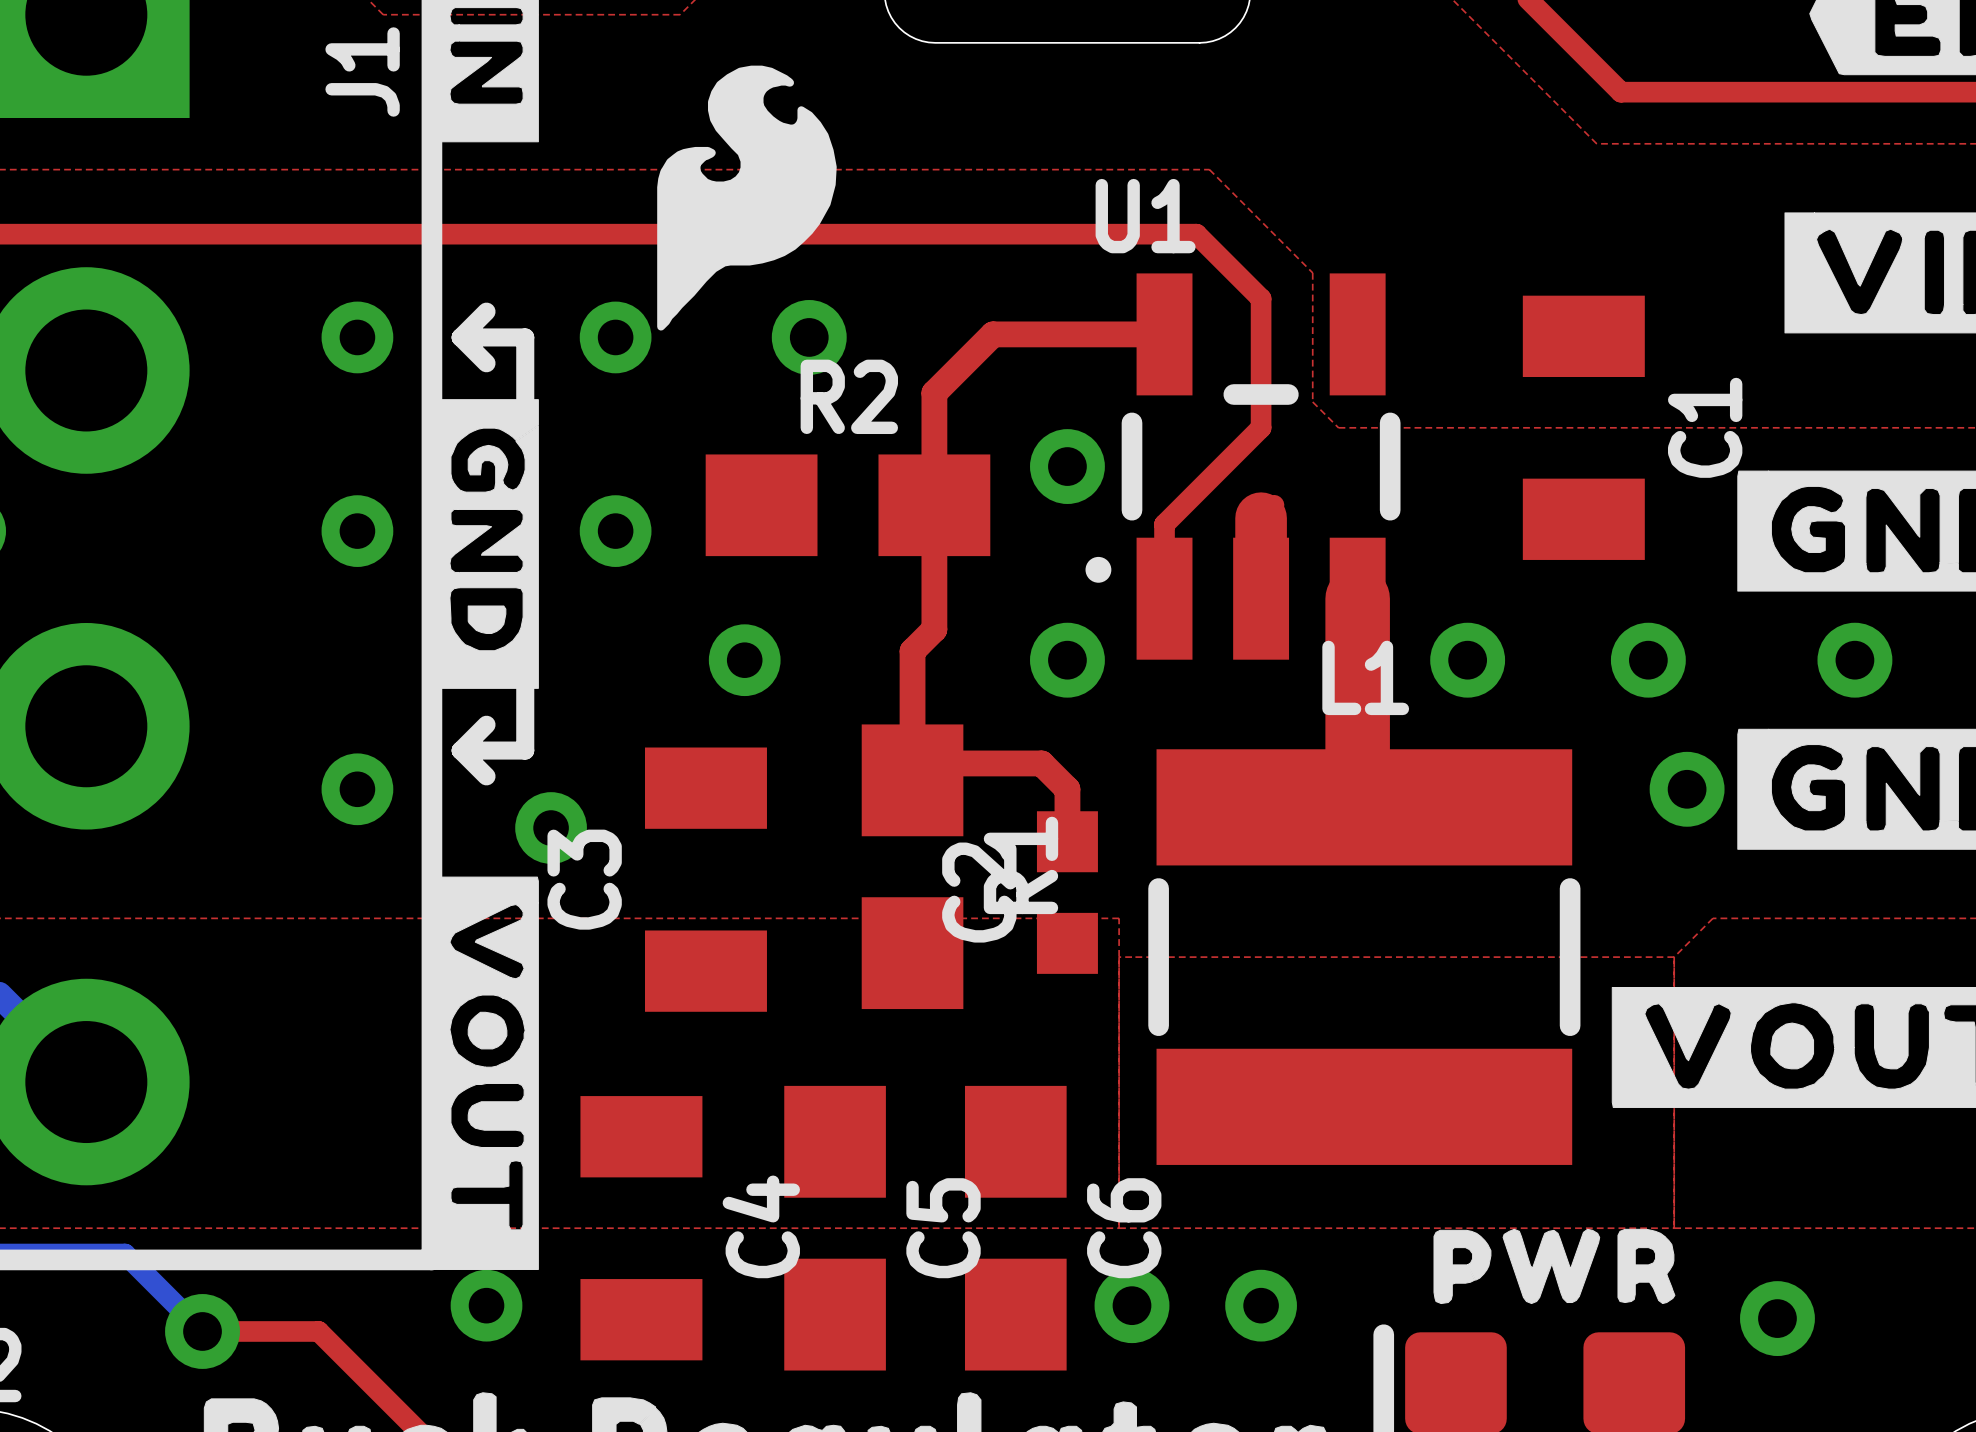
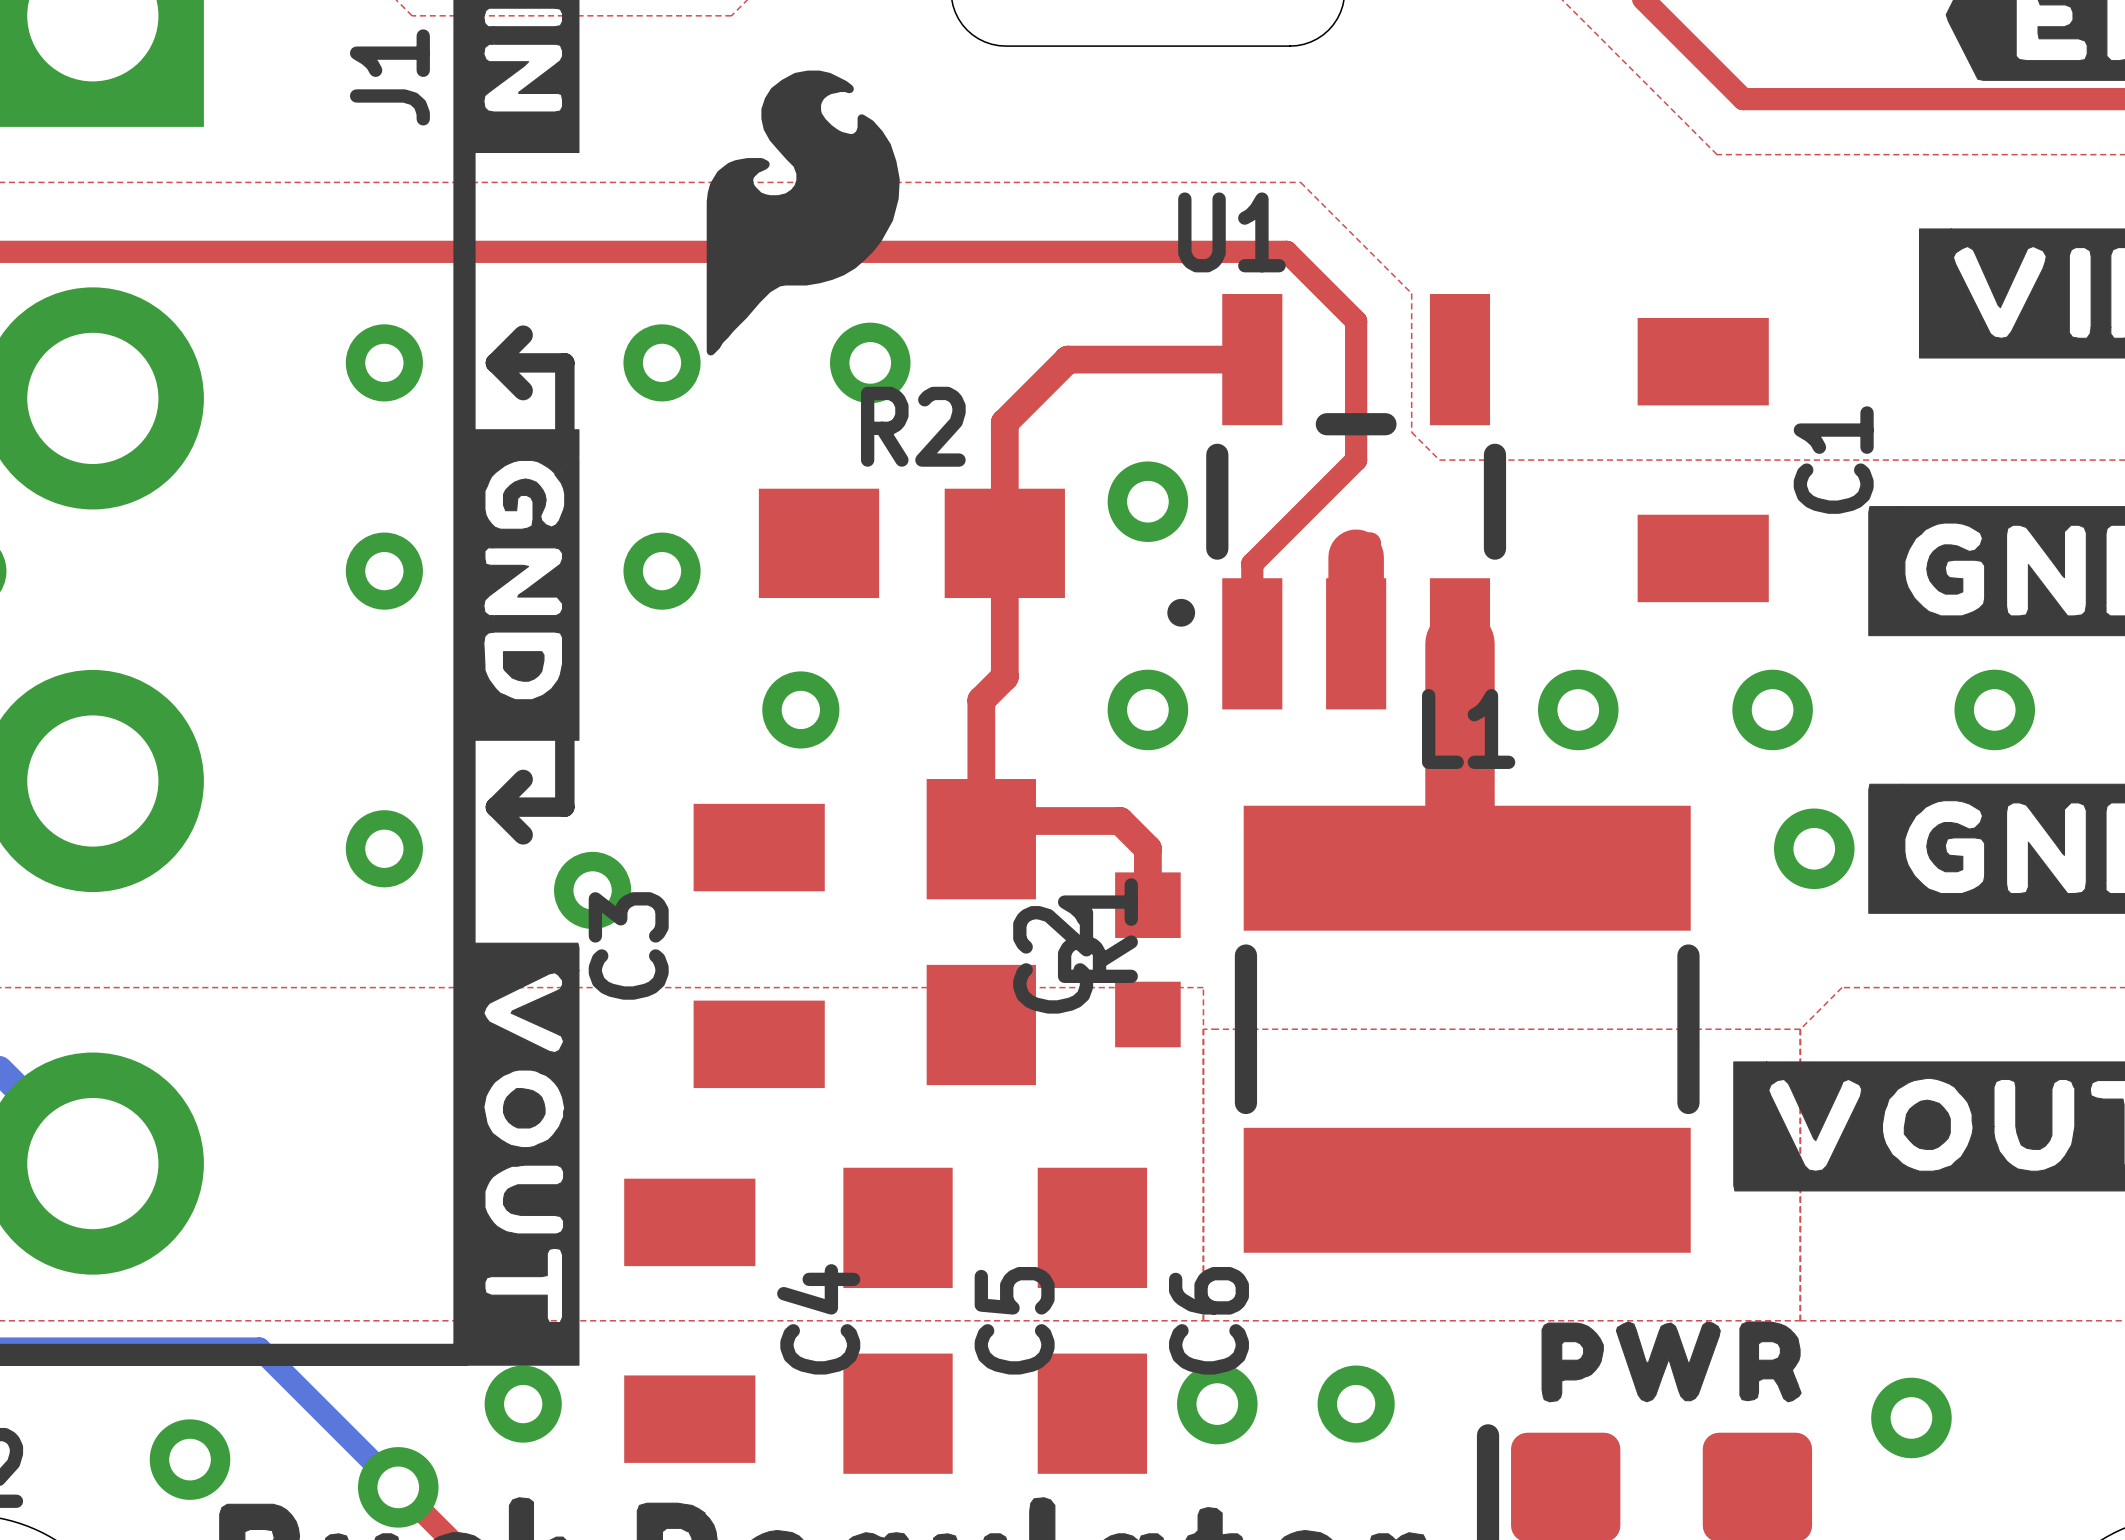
bottom track: (125, 1254) (202, 1331) -> (134, 1348) (259, 1348) (398, 1487)
top track: (202, 1331) (318, 1331) (370, 1383) -> none
via position: (202, 1331) -> (190, 1459)
via: none -> (398, 1487)

